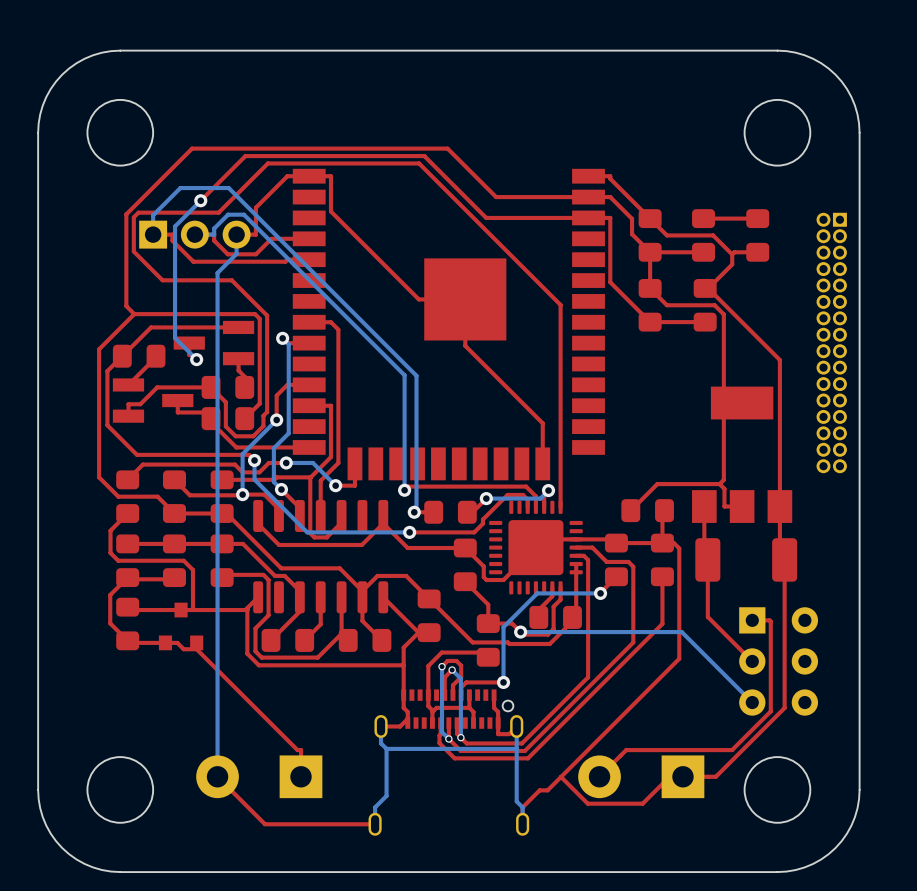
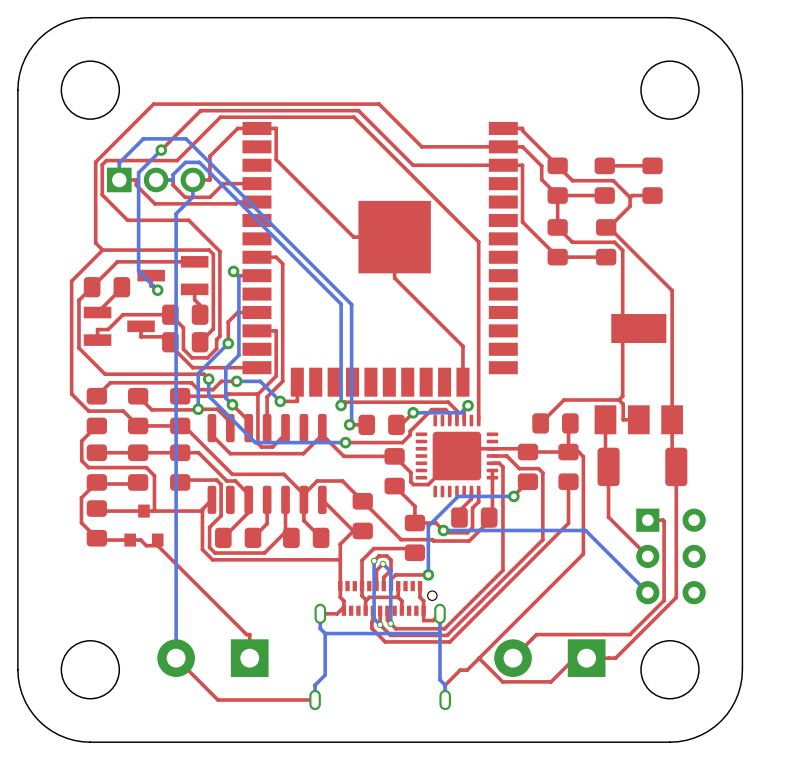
part: (831, 342) -> none

